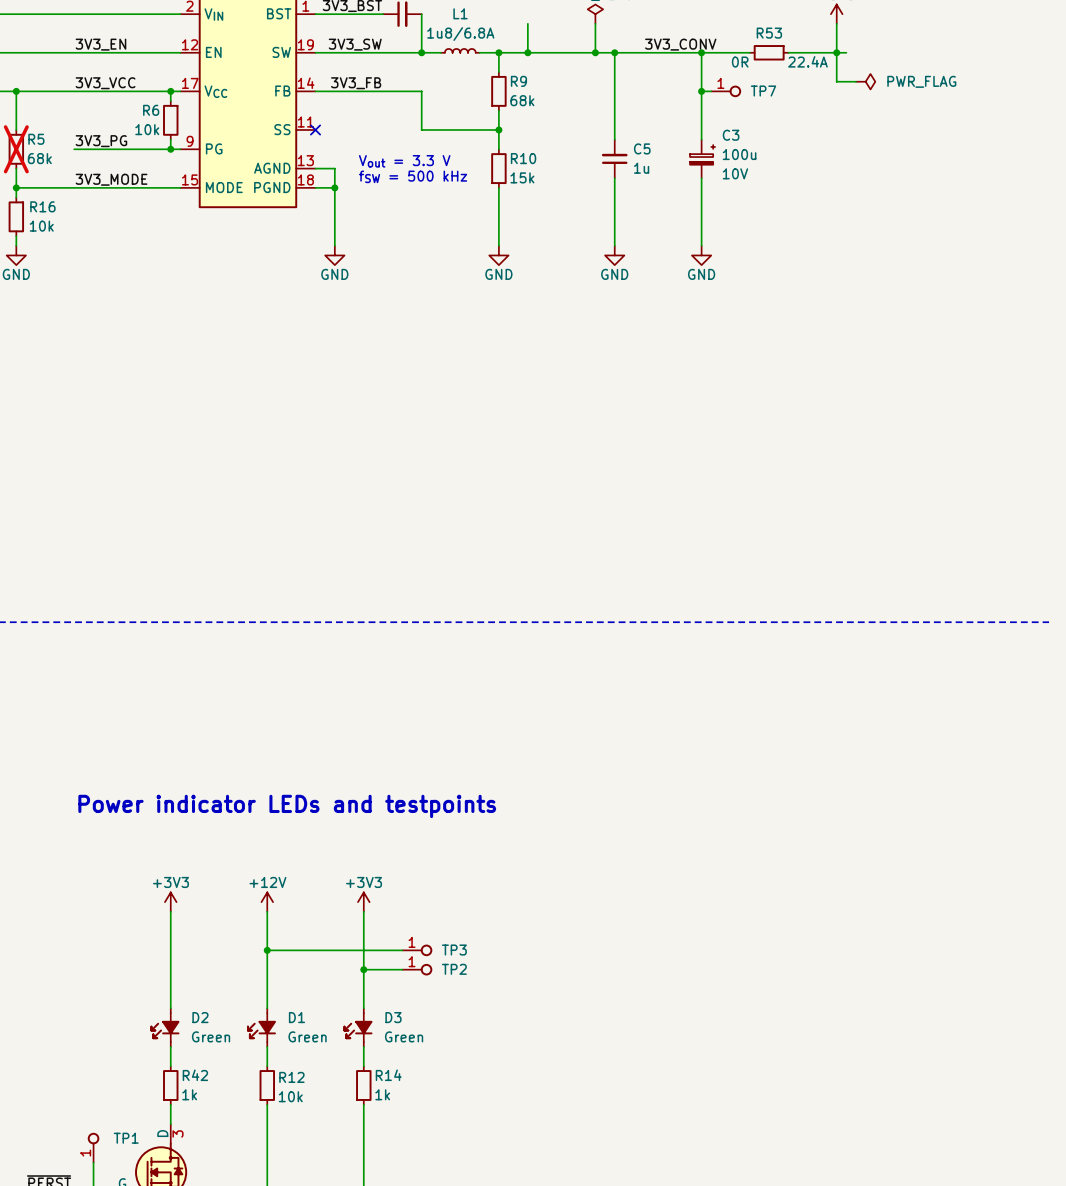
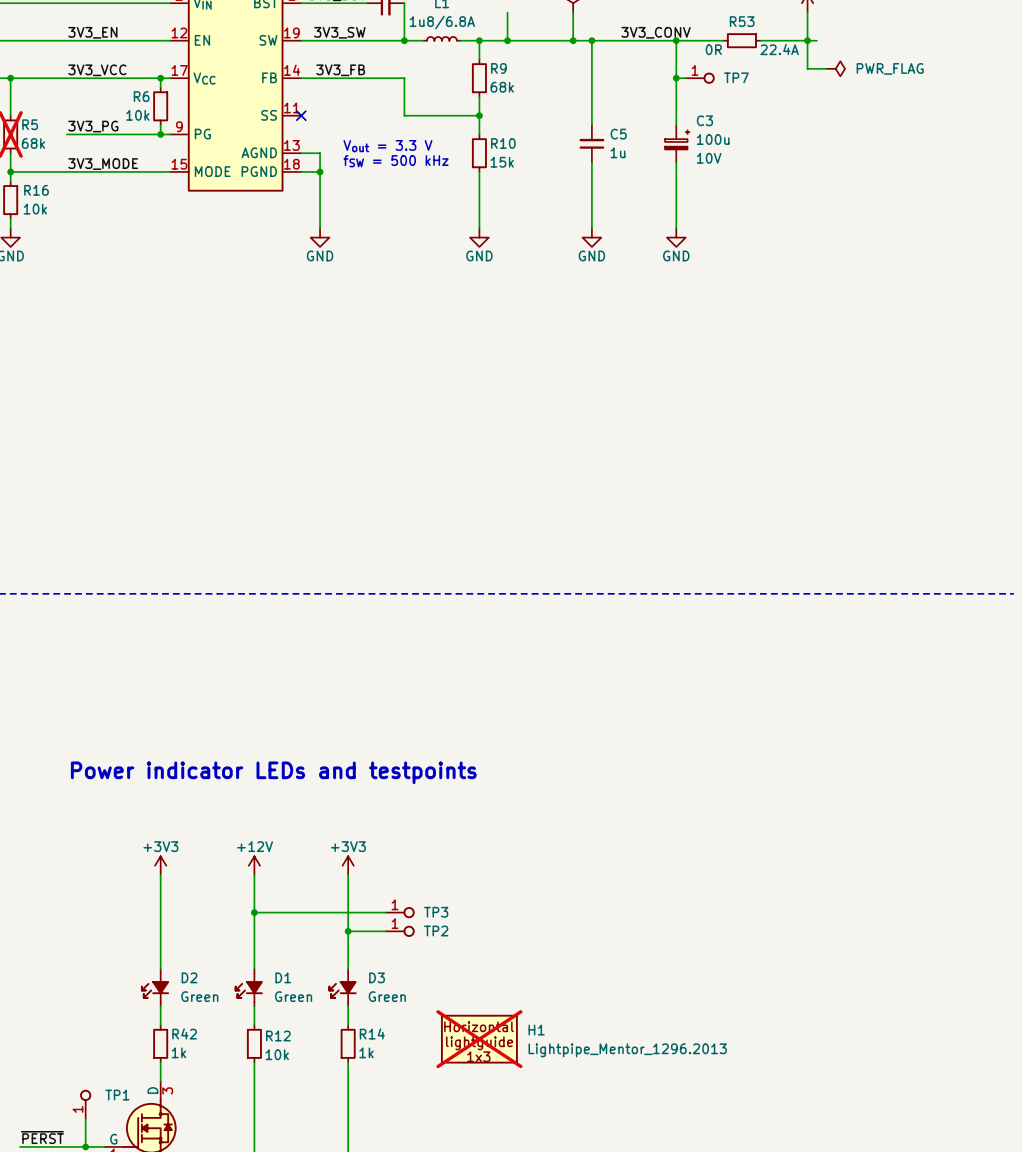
H1: none -> Lightpipe_Mentor_1296.2013 (479, 1039)

